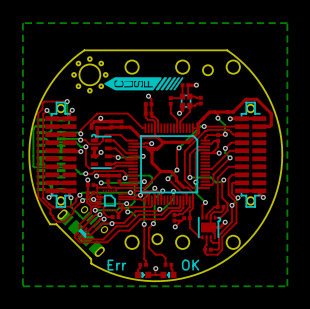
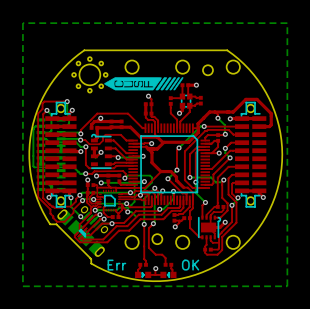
via: none -> (80, 216)

